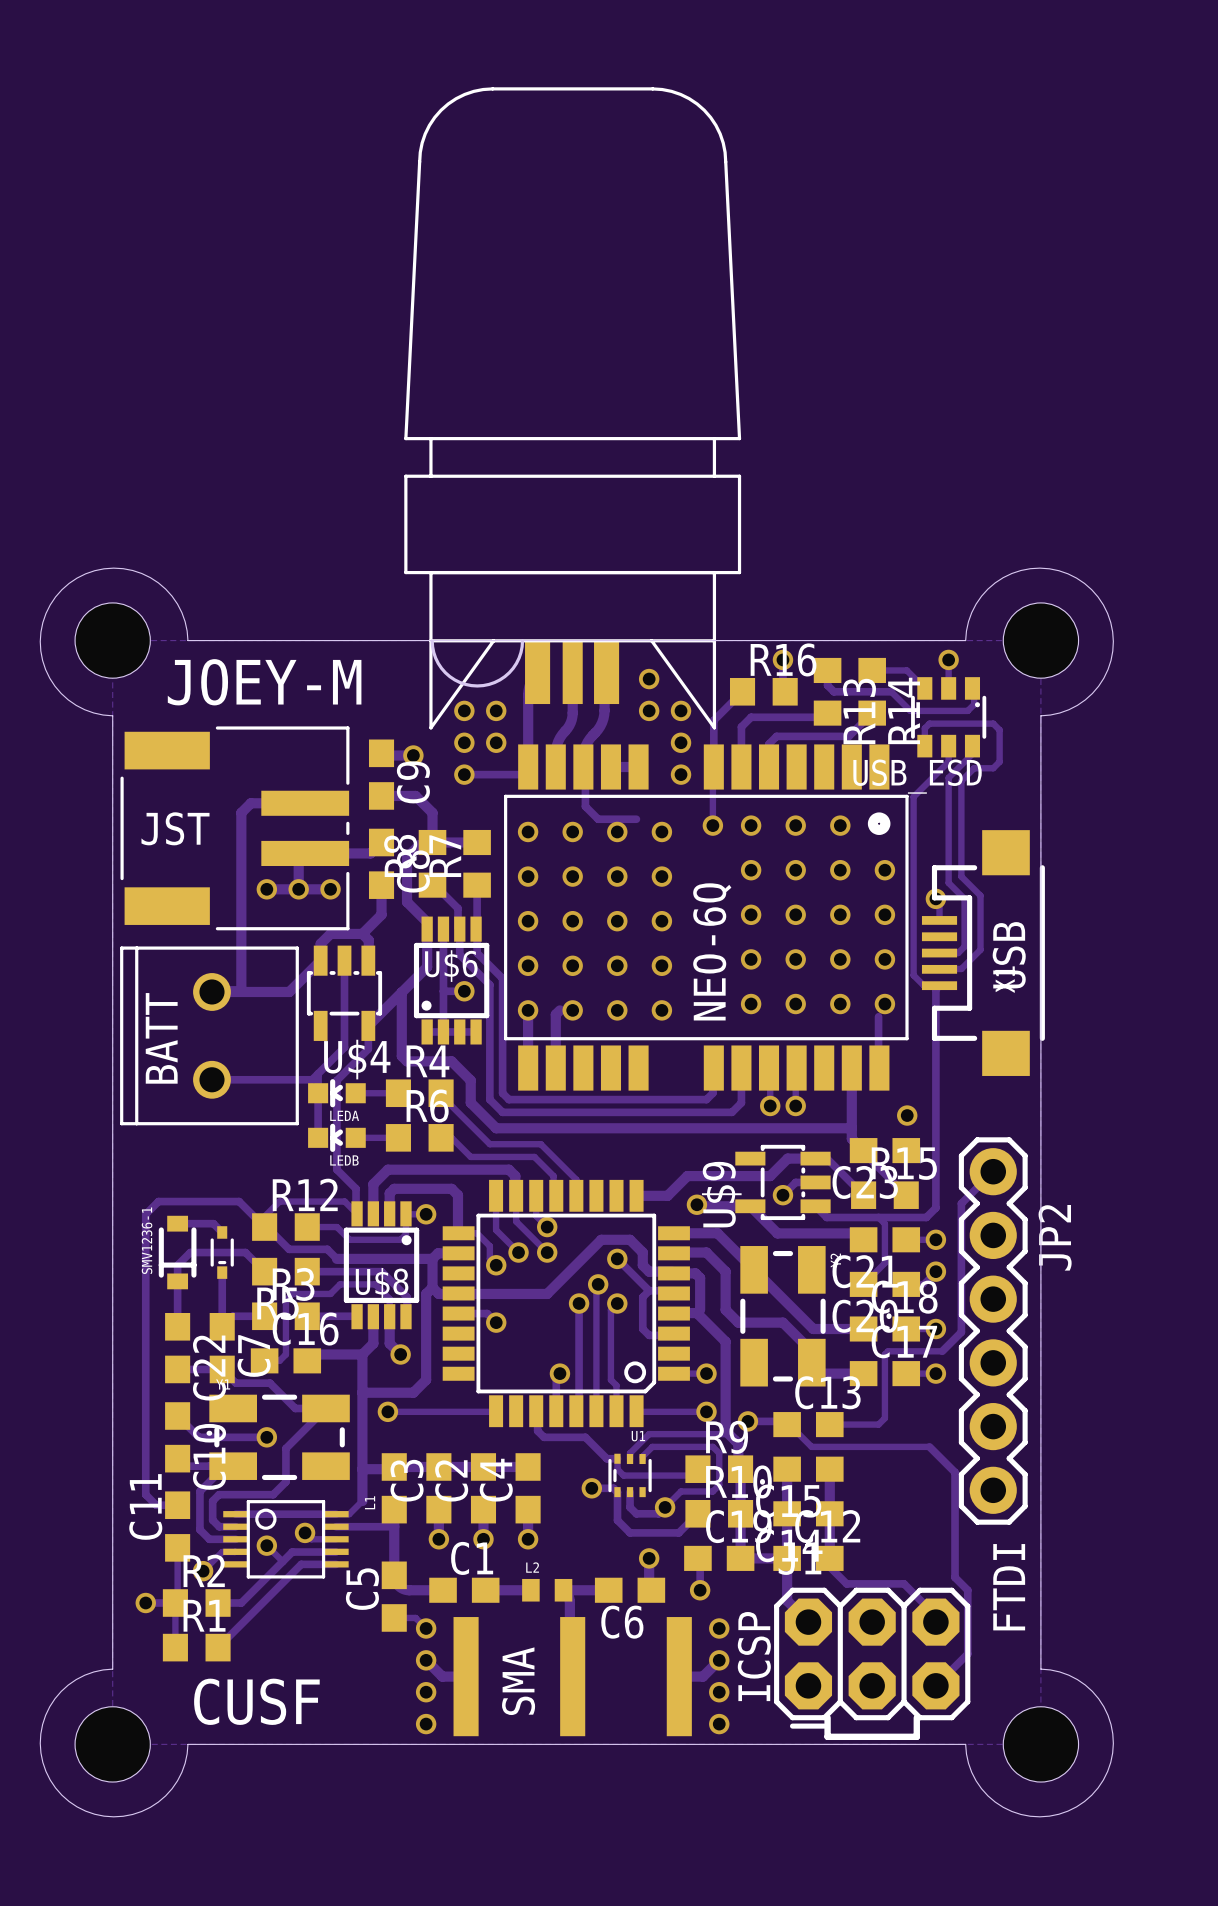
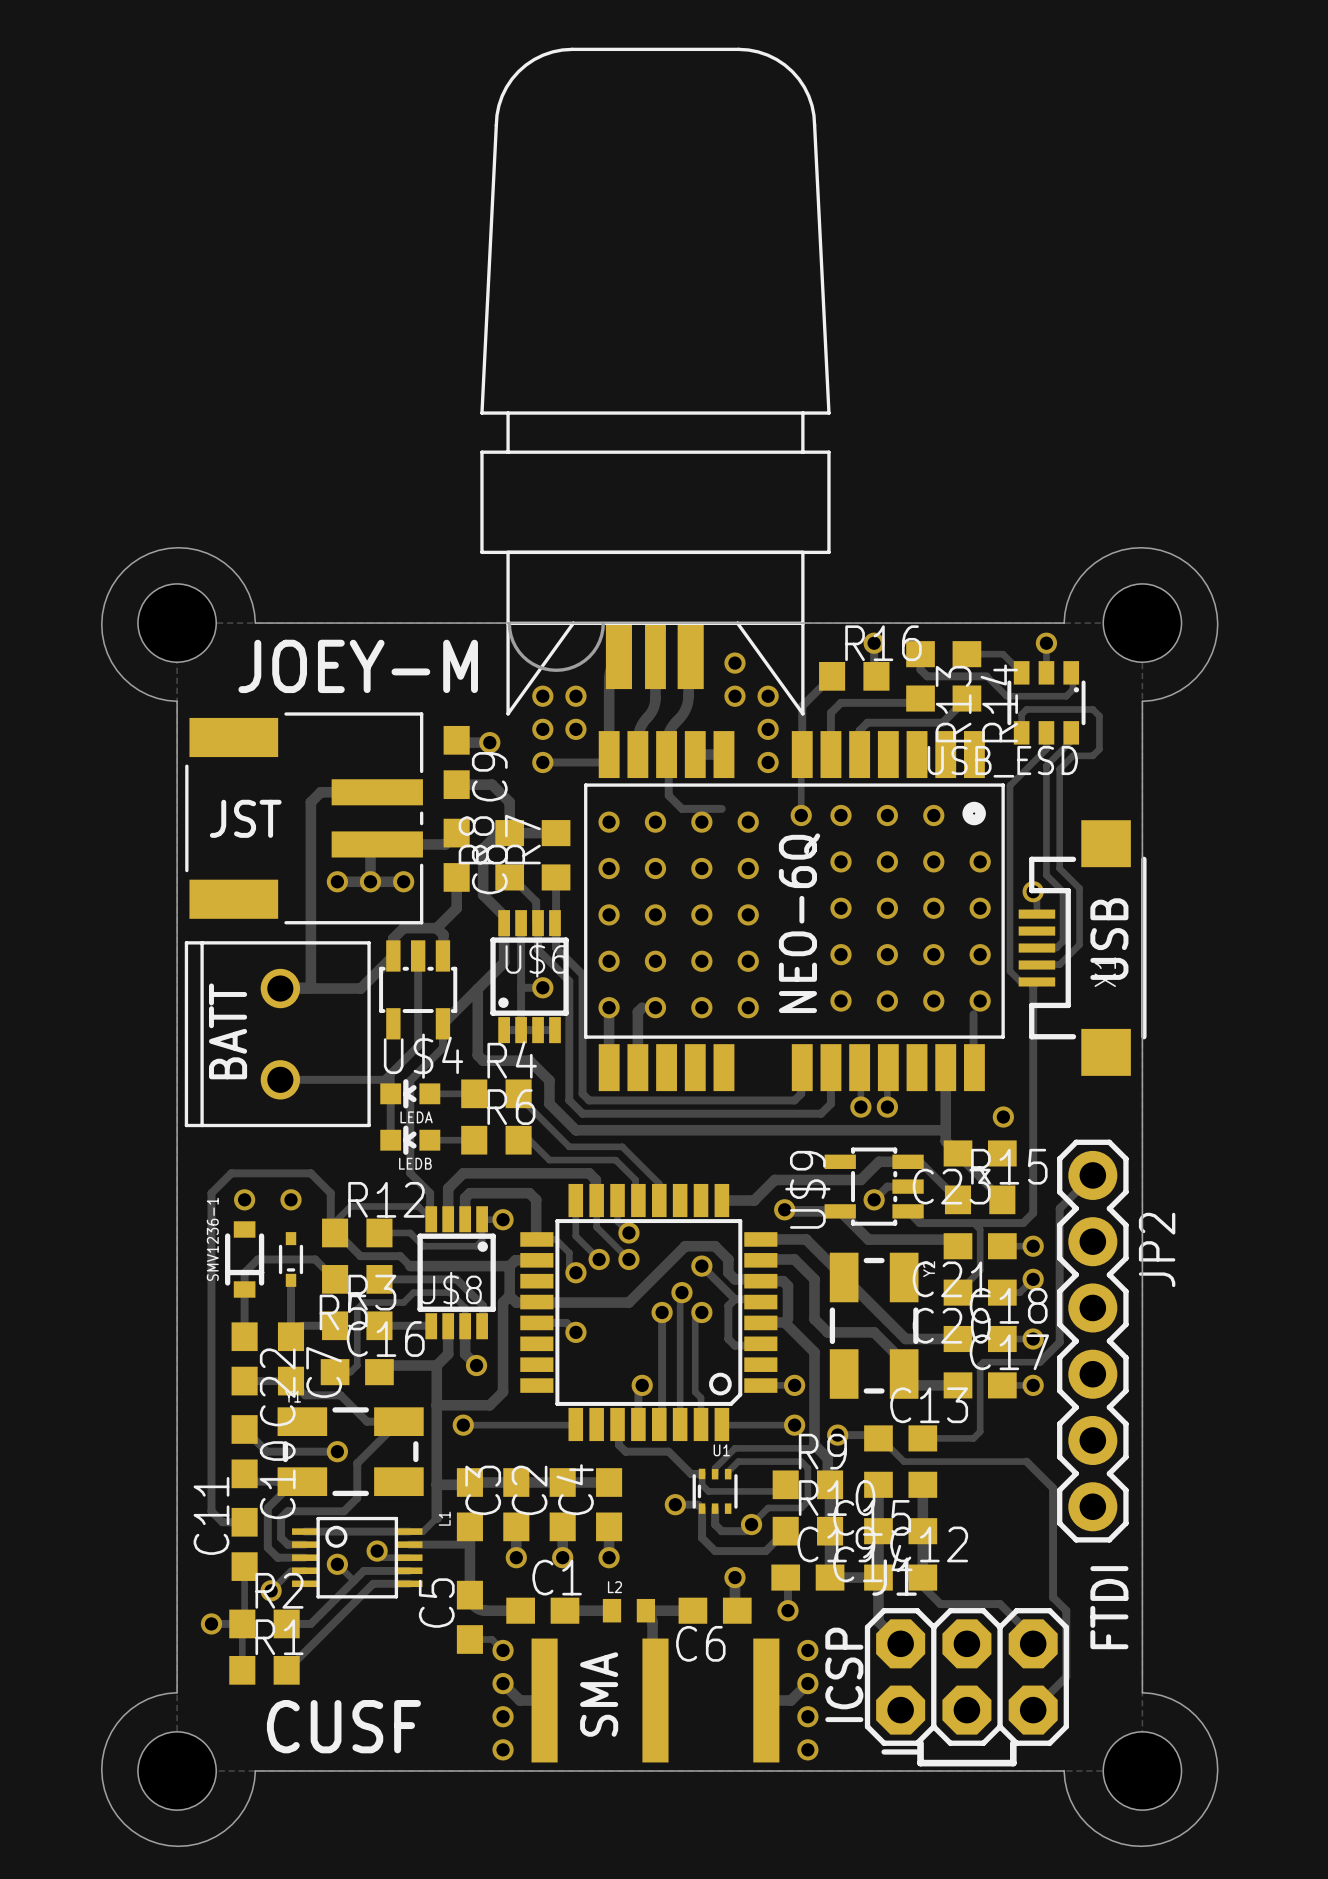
via: none -> (244, 1199)
via: none -> (291, 1199)
track: (145, 1214) (158, 1201) (239, 1201) (264, 1227) -> (211, 1219) (211, 1193) (231, 1173) (310, 1173) (330, 1193) (330, 1226) (337, 1232)
track: (177, 1223) (213, 1223) (222, 1232) -> none

